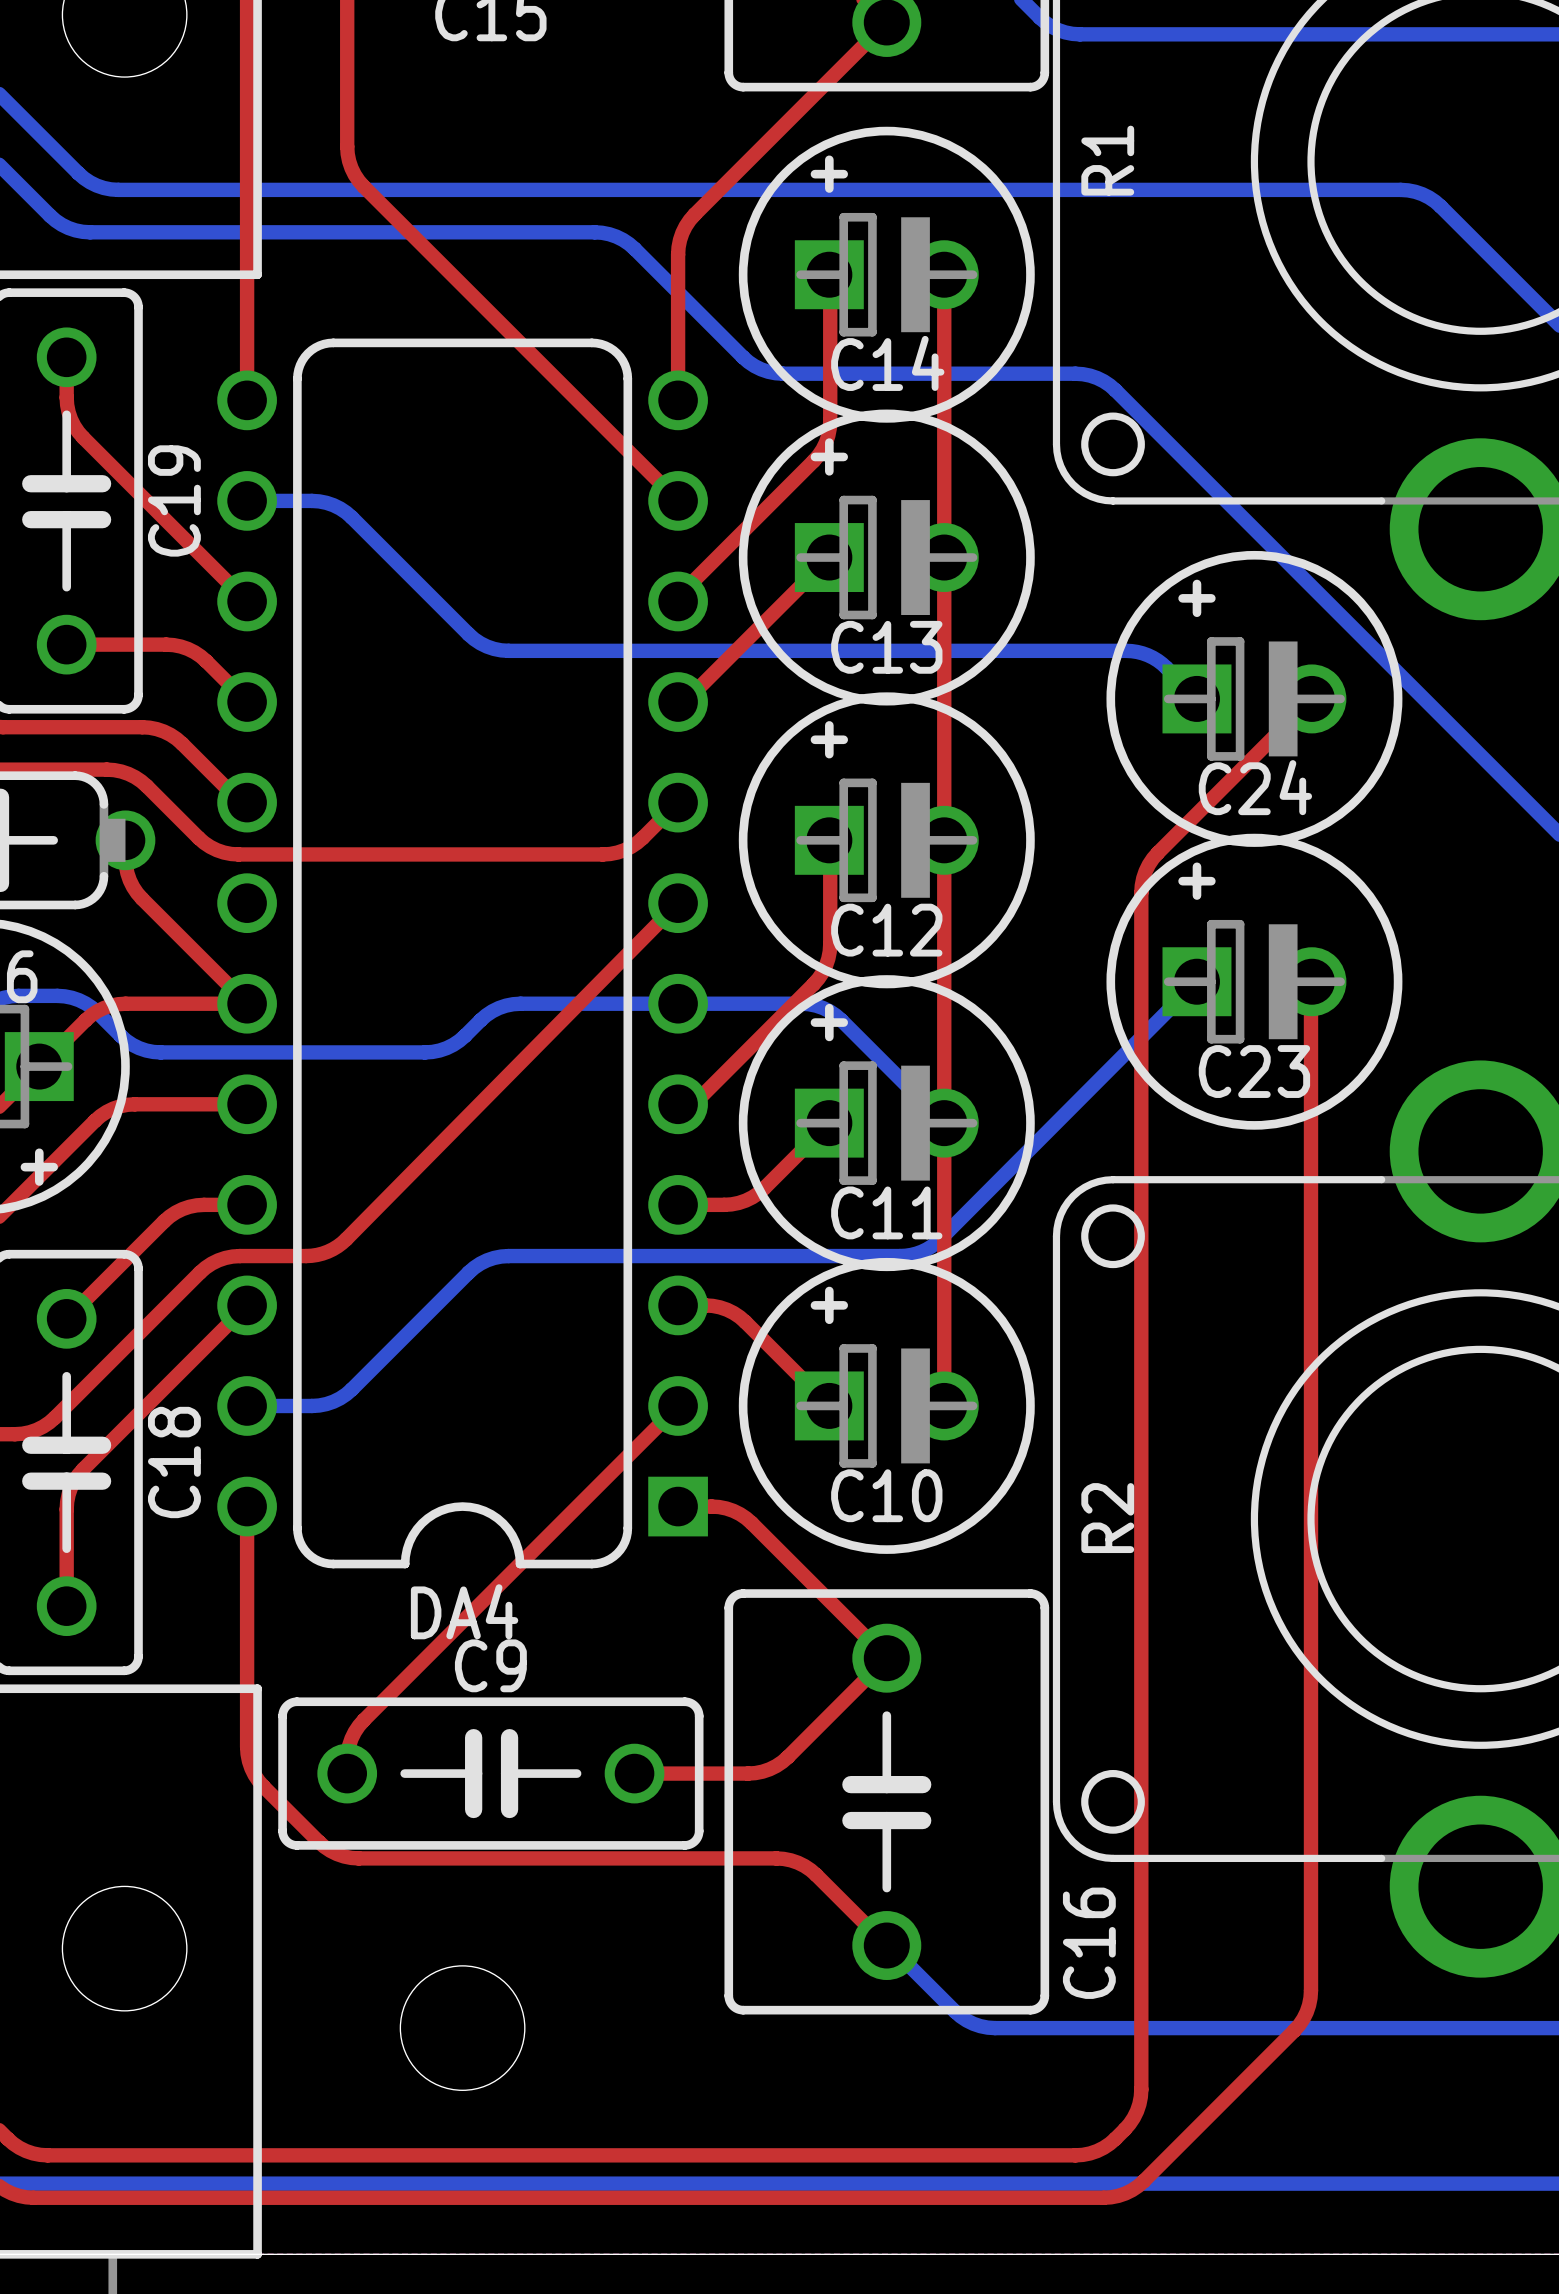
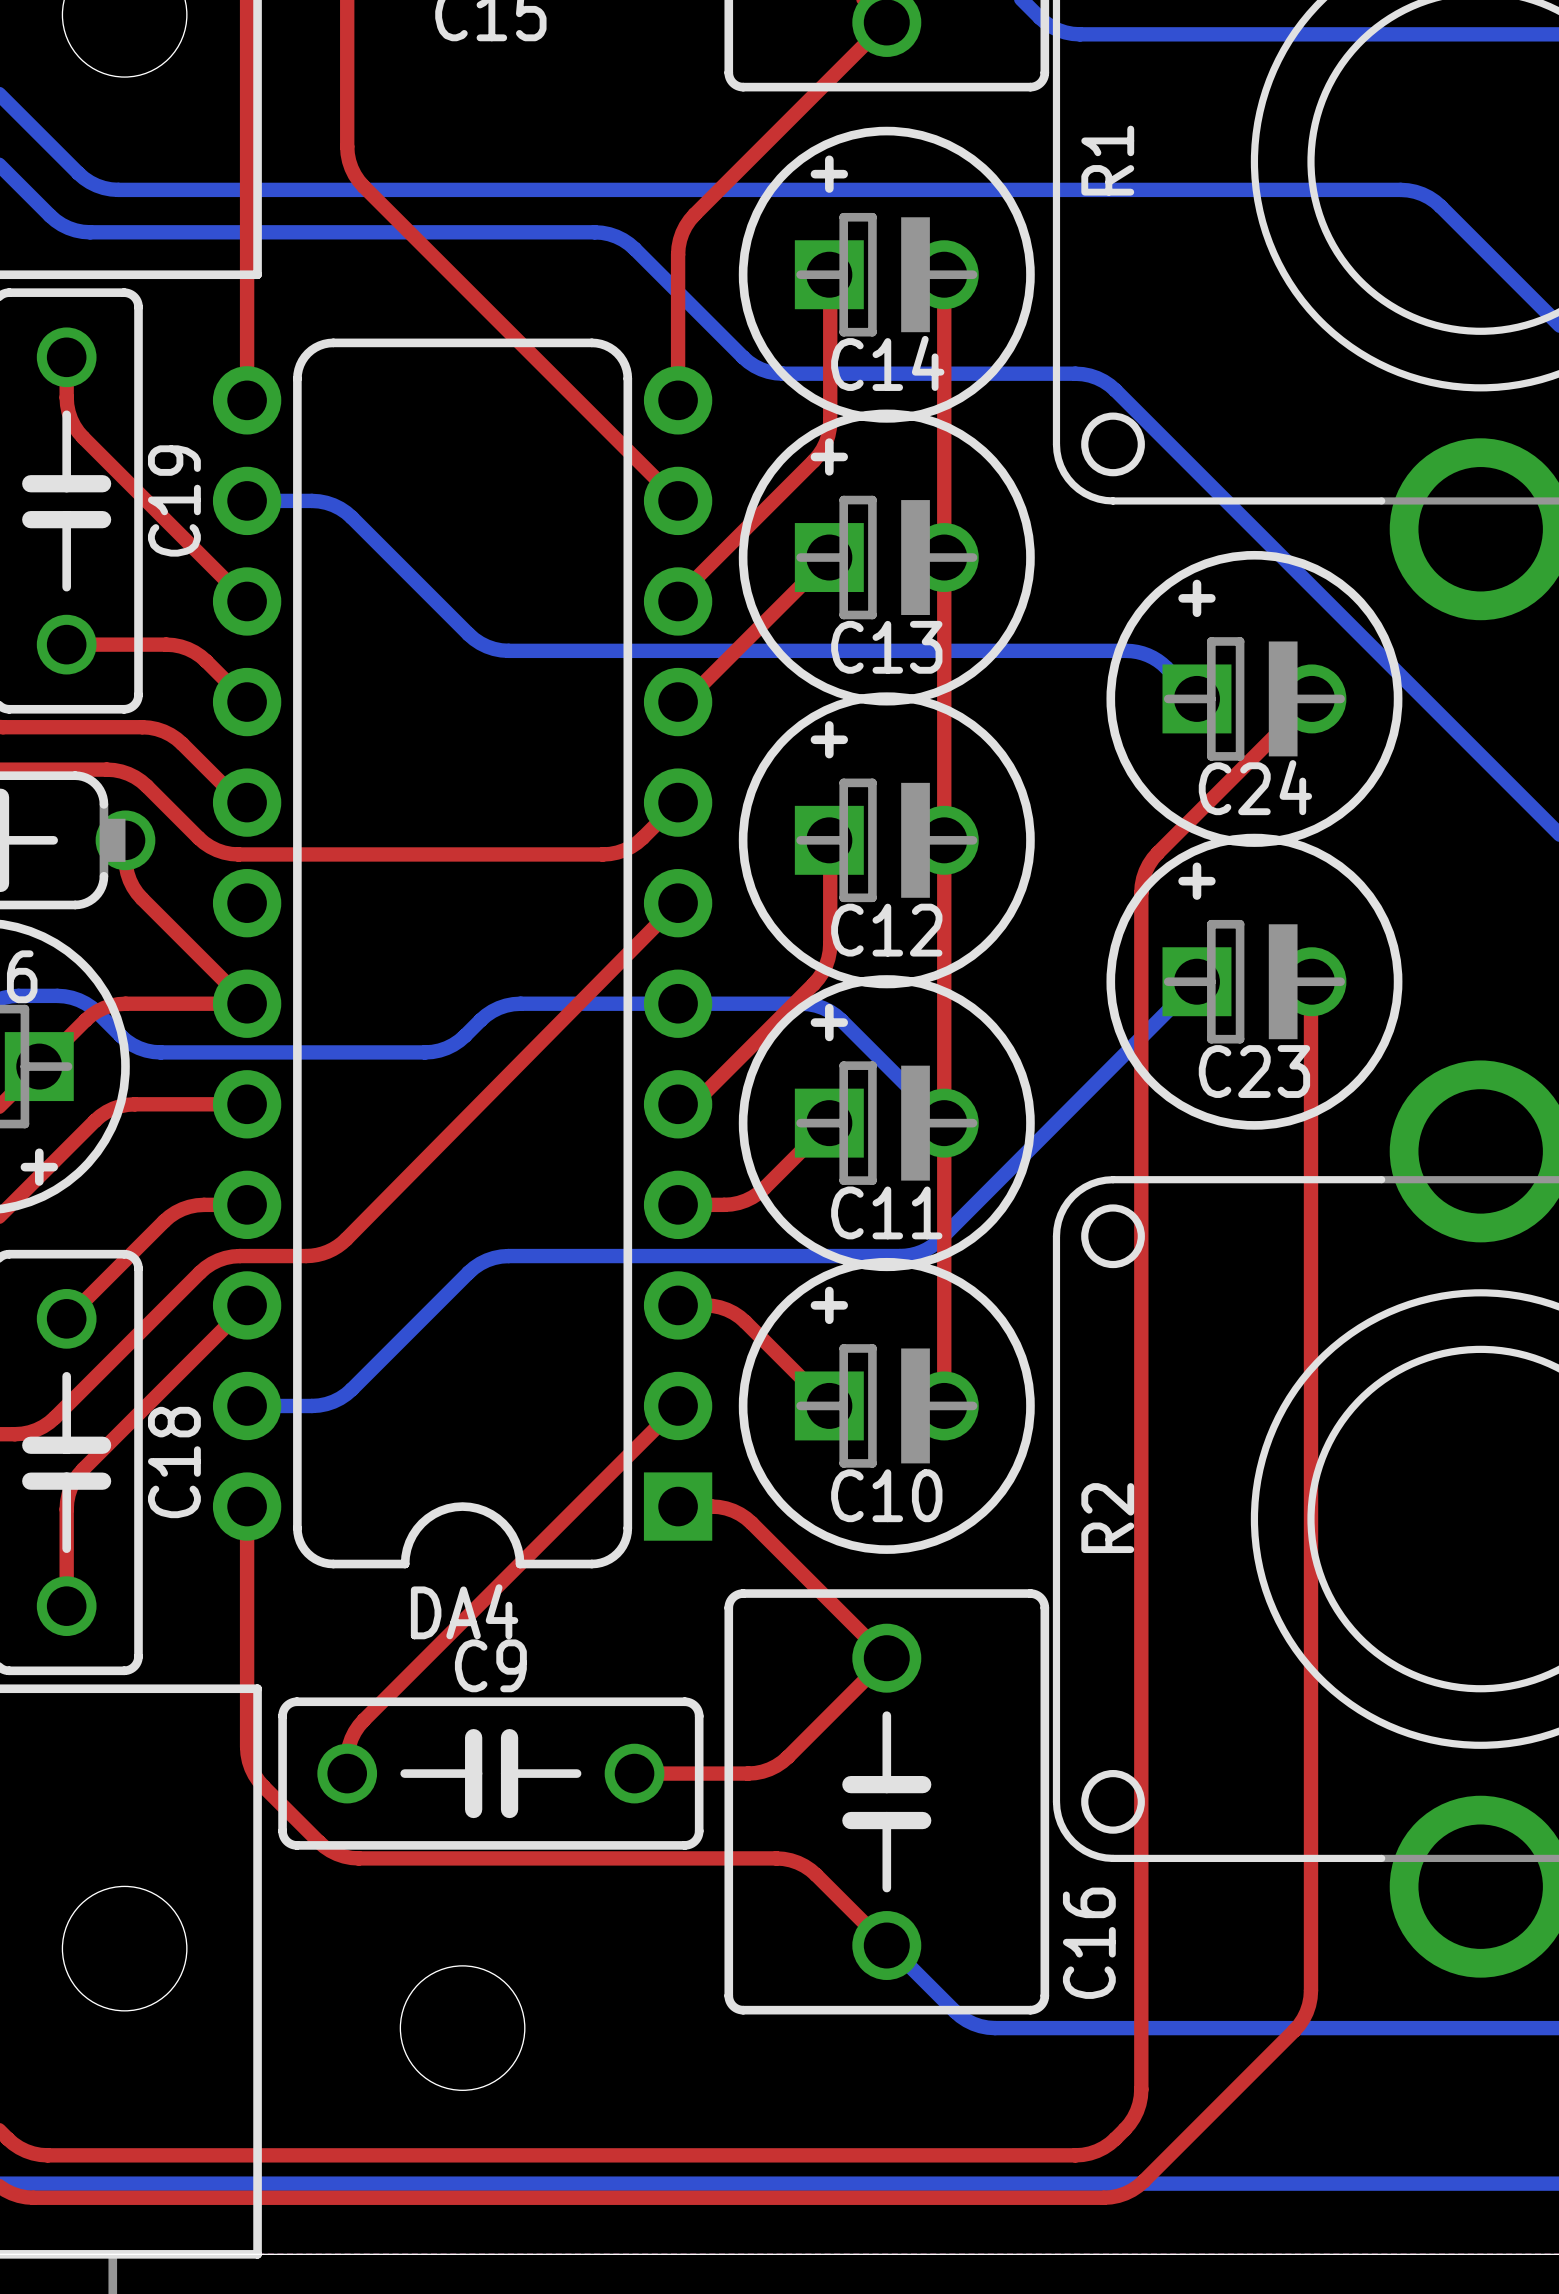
DA4 footprint: [217, 338, 708, 1569] -> [212, 338, 713, 1569]

